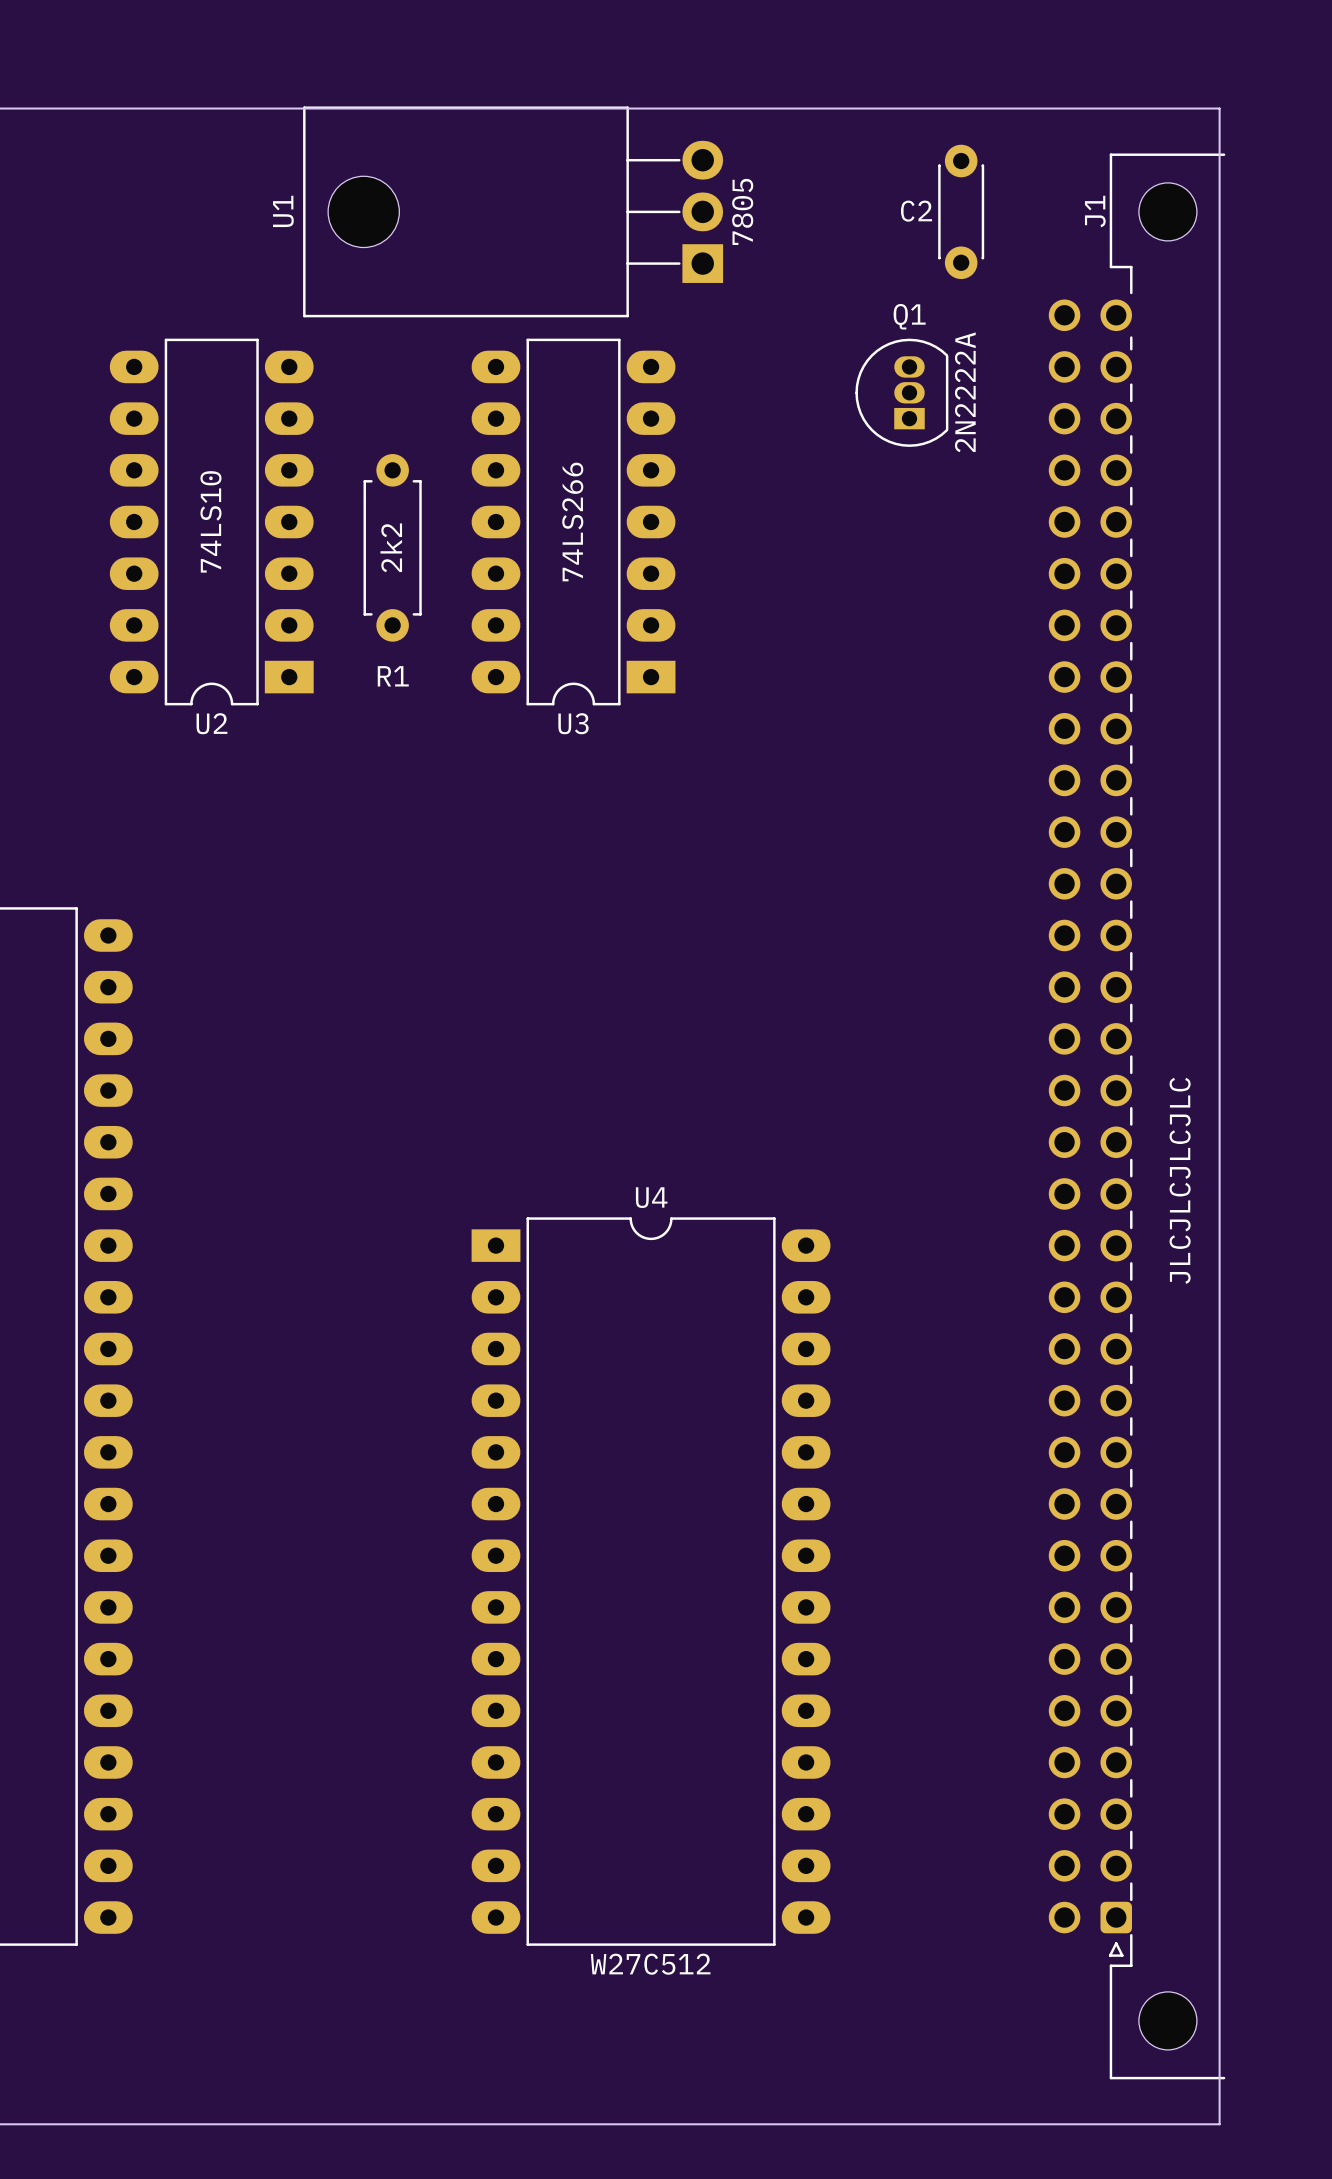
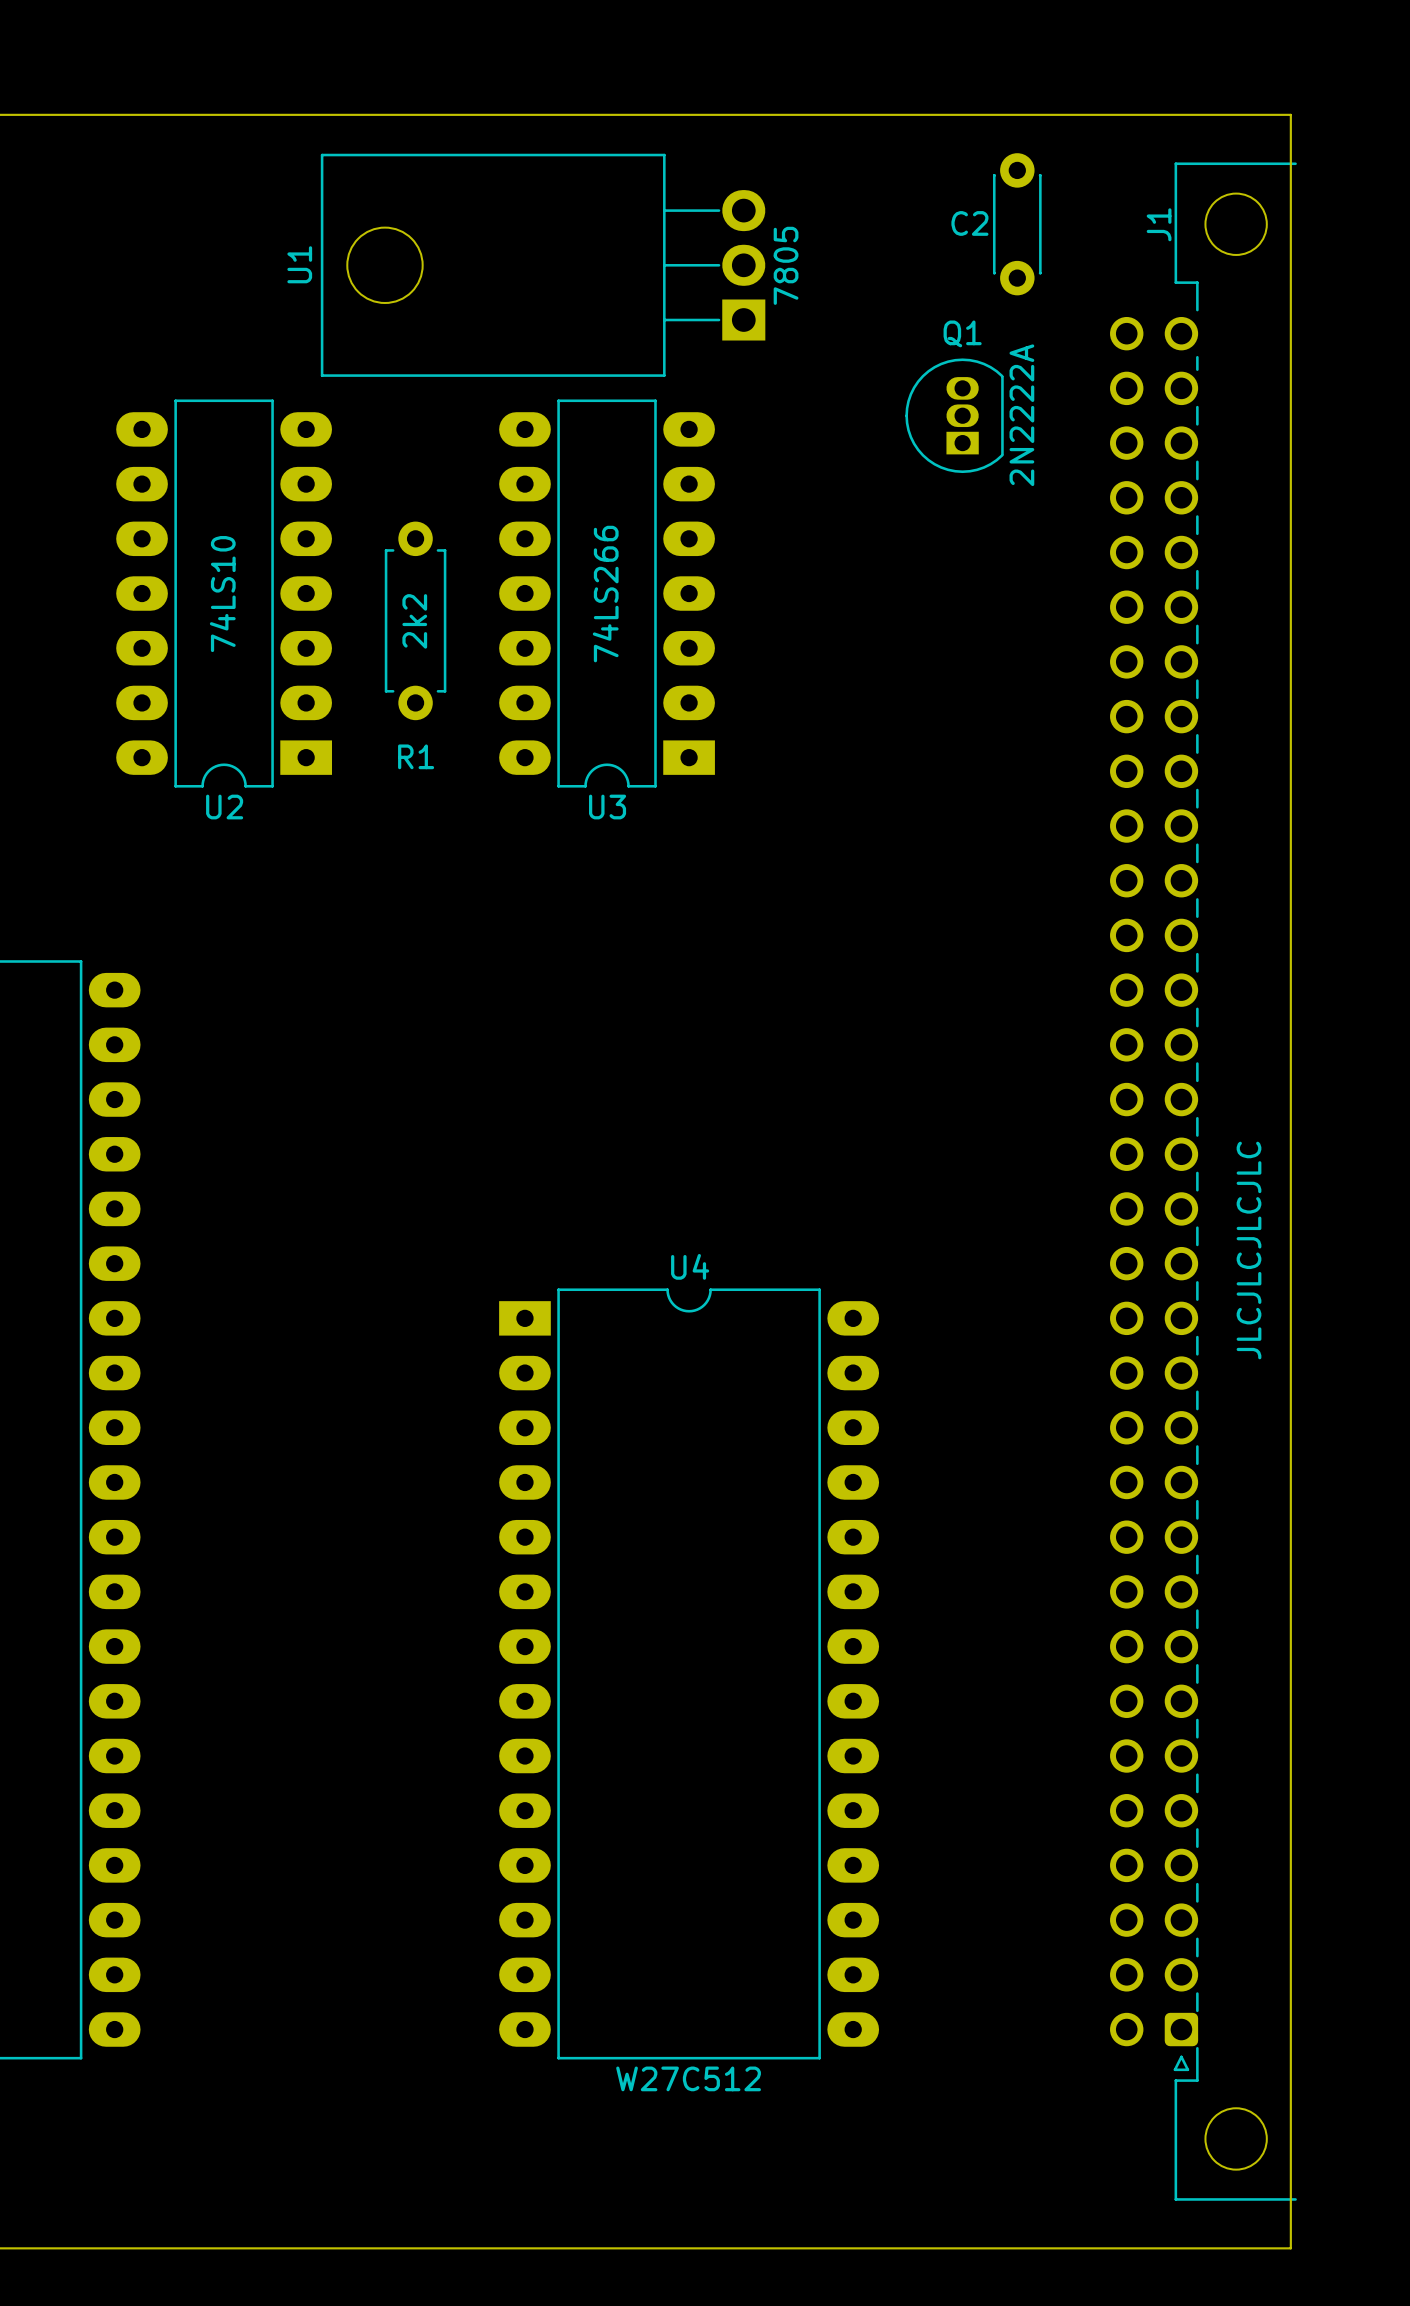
U1 position: (513, 211) -> (543, 265)
U2 position: (211, 522) -> (224, 593)
U3 position: (573, 522) -> (607, 593)
R1 position: (392, 547) -> (415, 620)

